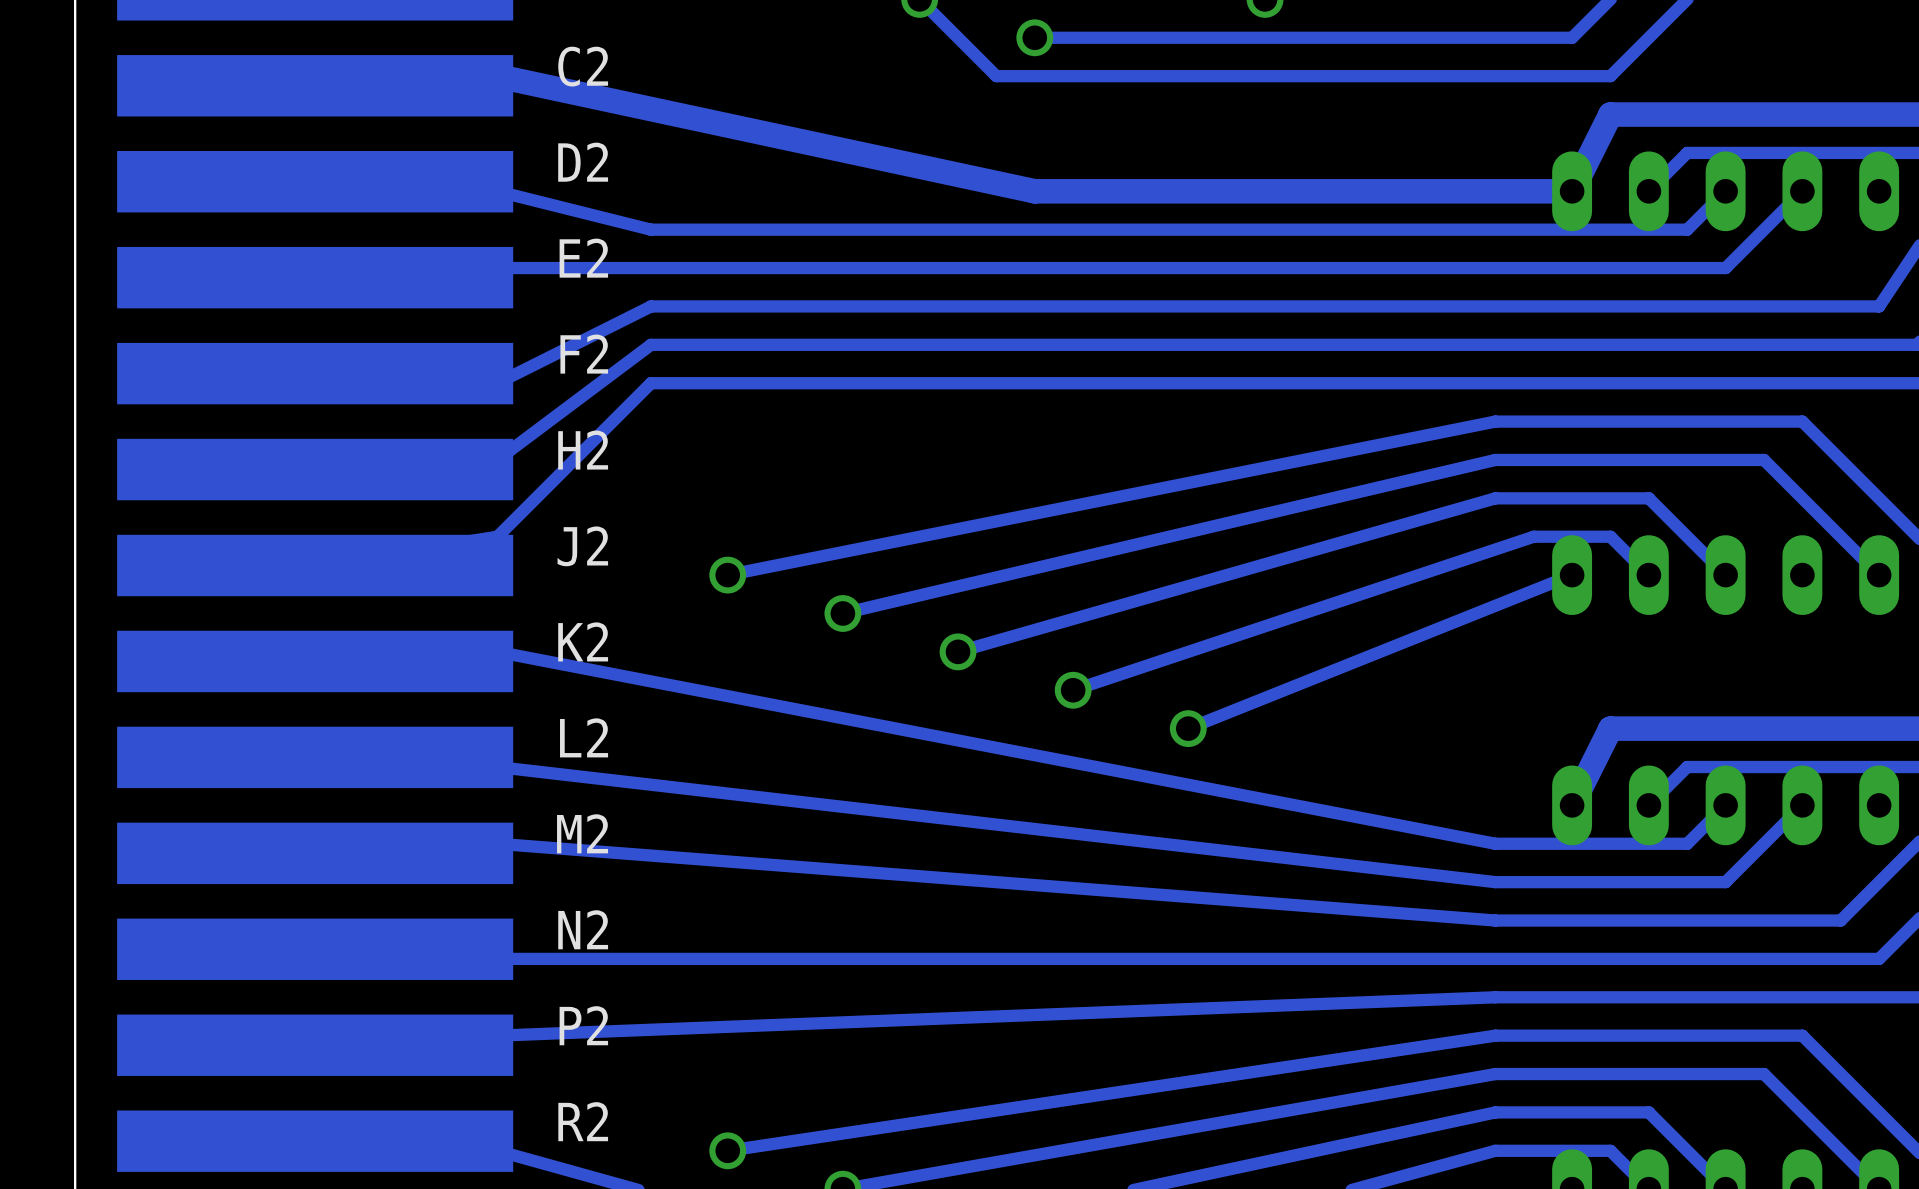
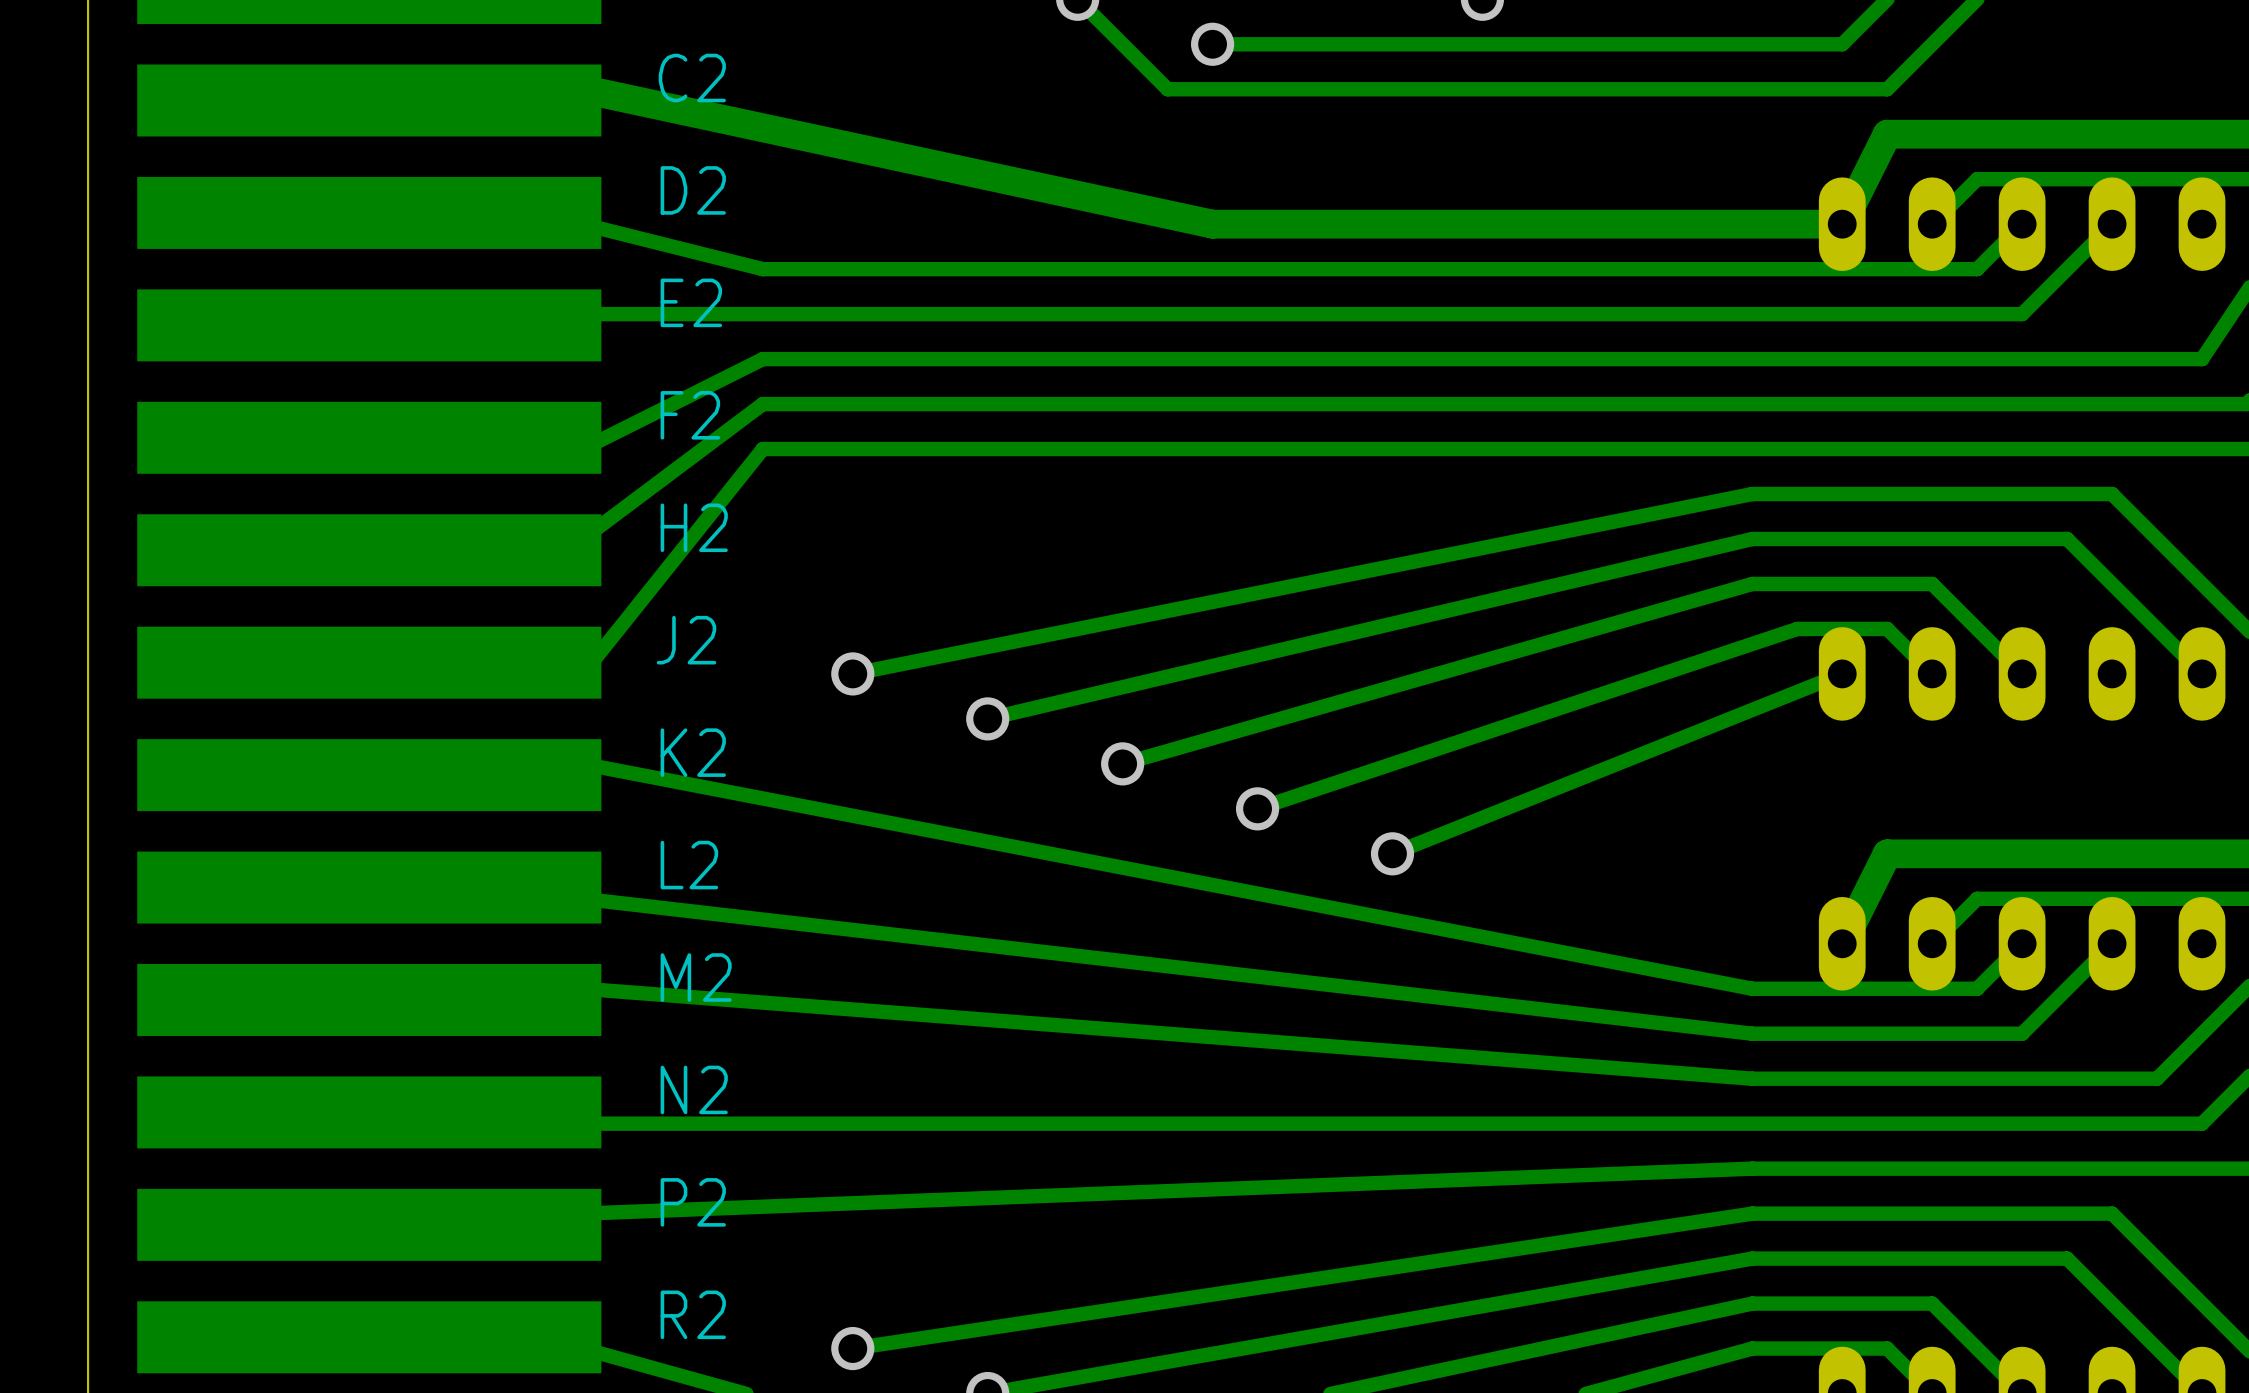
track: (650, 383) (497, 536) (315, 565) -> (762, 449) (582, 673) (369, 662)

